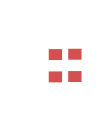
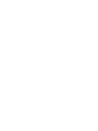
part: (55, 65) -> none
part: (74, 65) -> none

